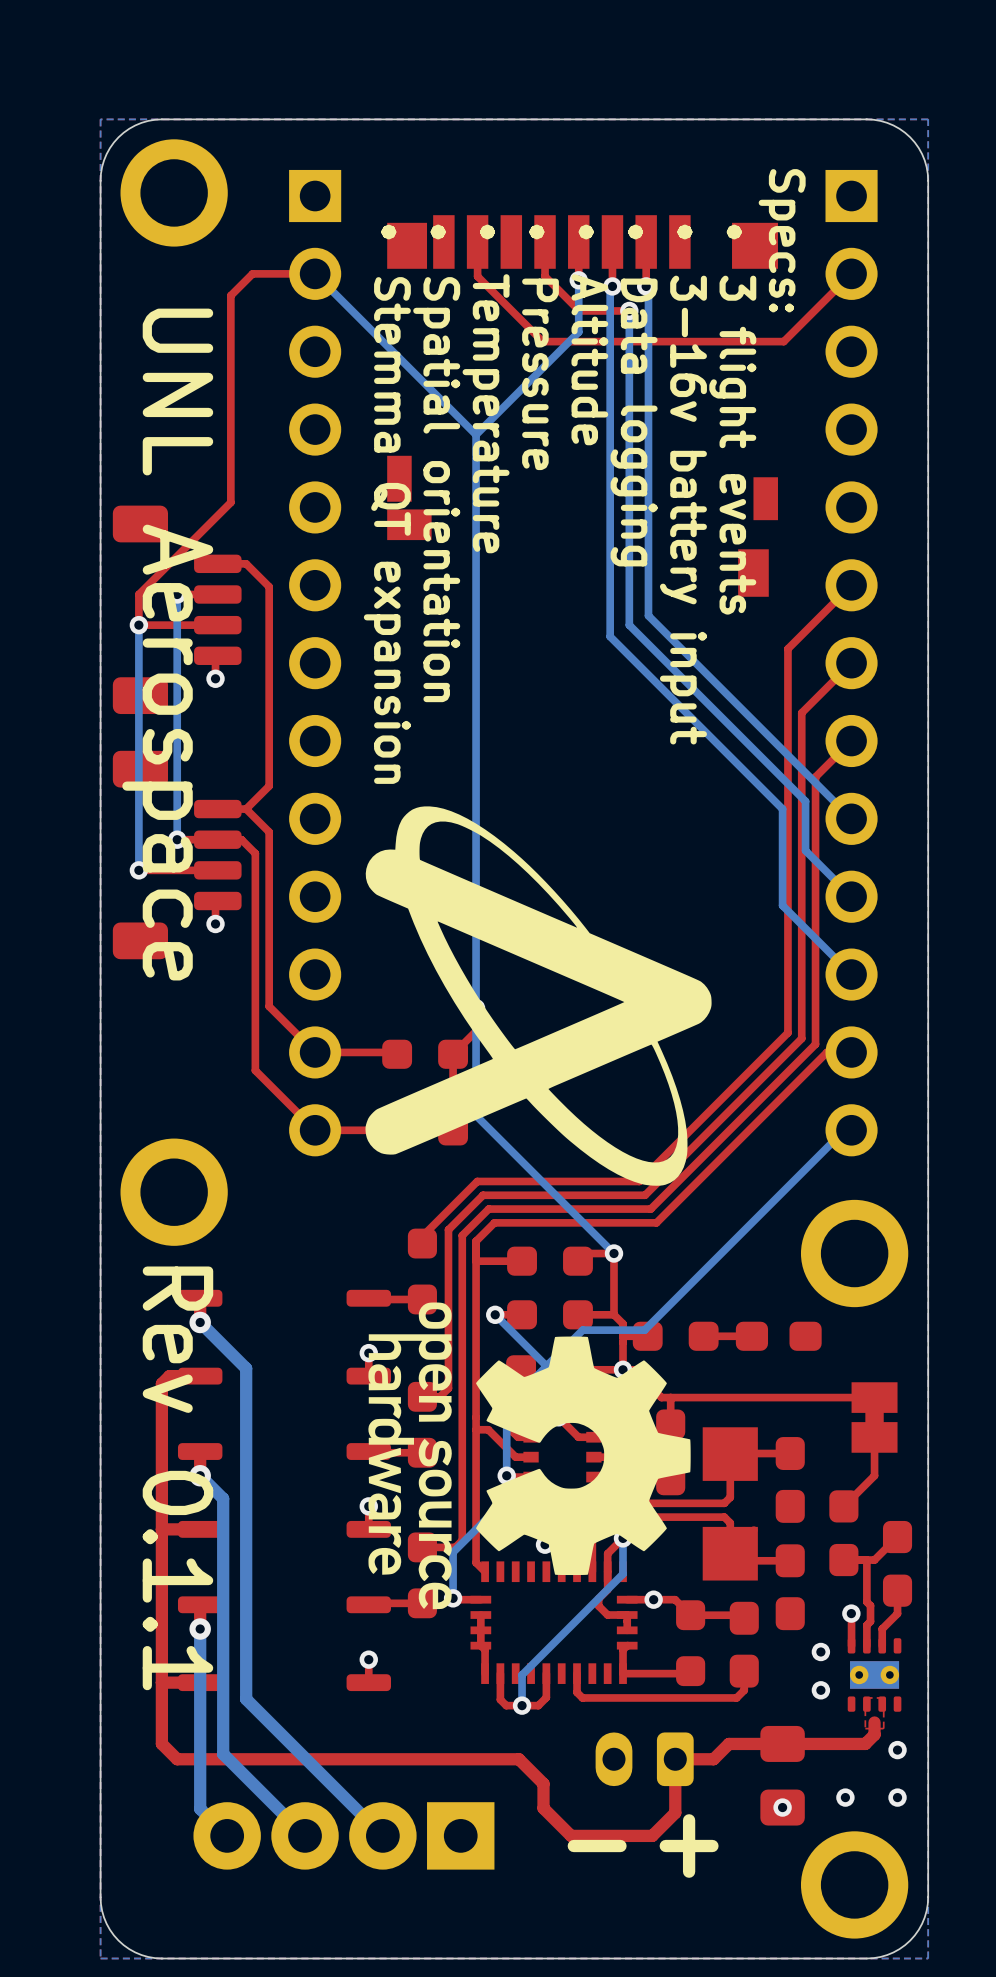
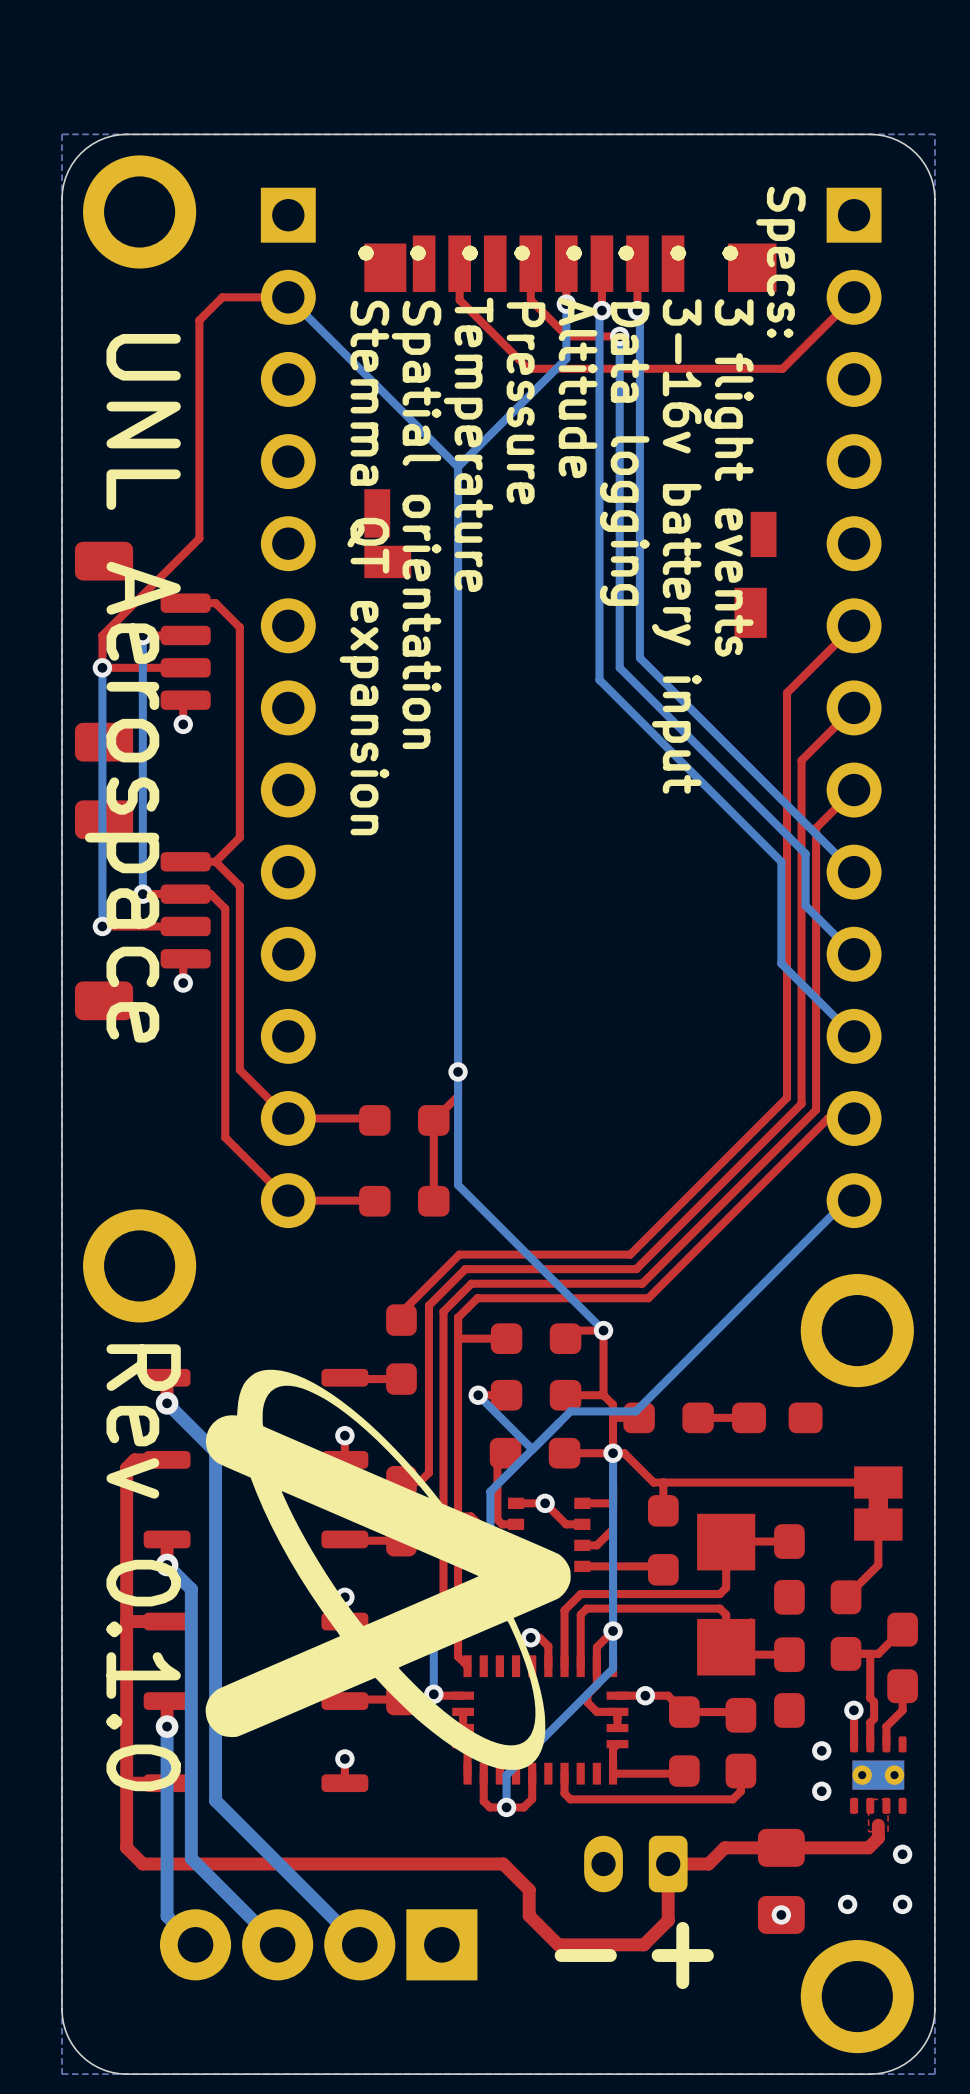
drawing position: (538, 996) -> (388, 1569)
drawing: [368, 1302, 691, 1610] -> none
text: Rev 0.1.1 (177, 1478) -> Rev 0.1.0 (143, 1567)

